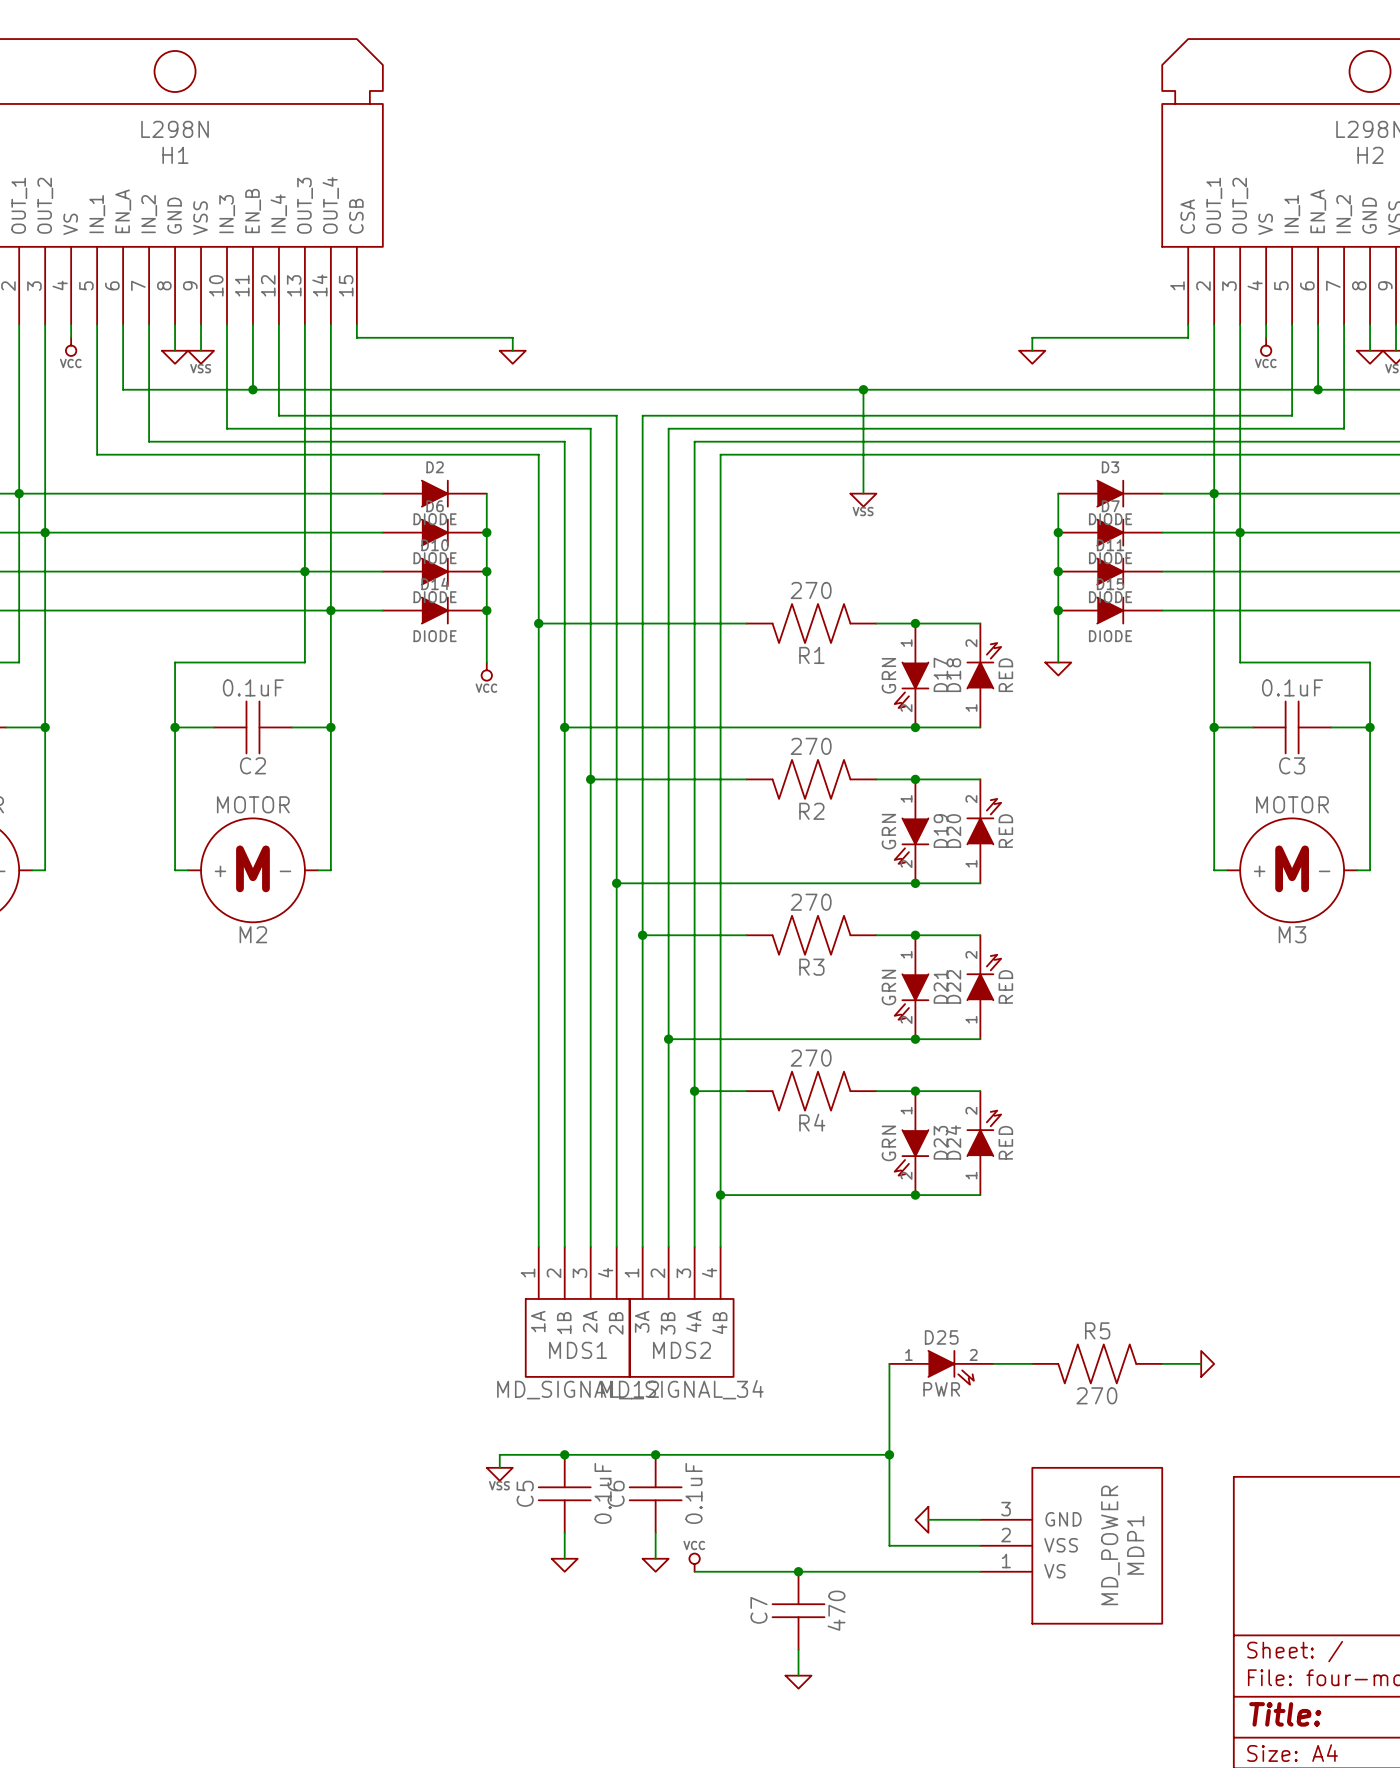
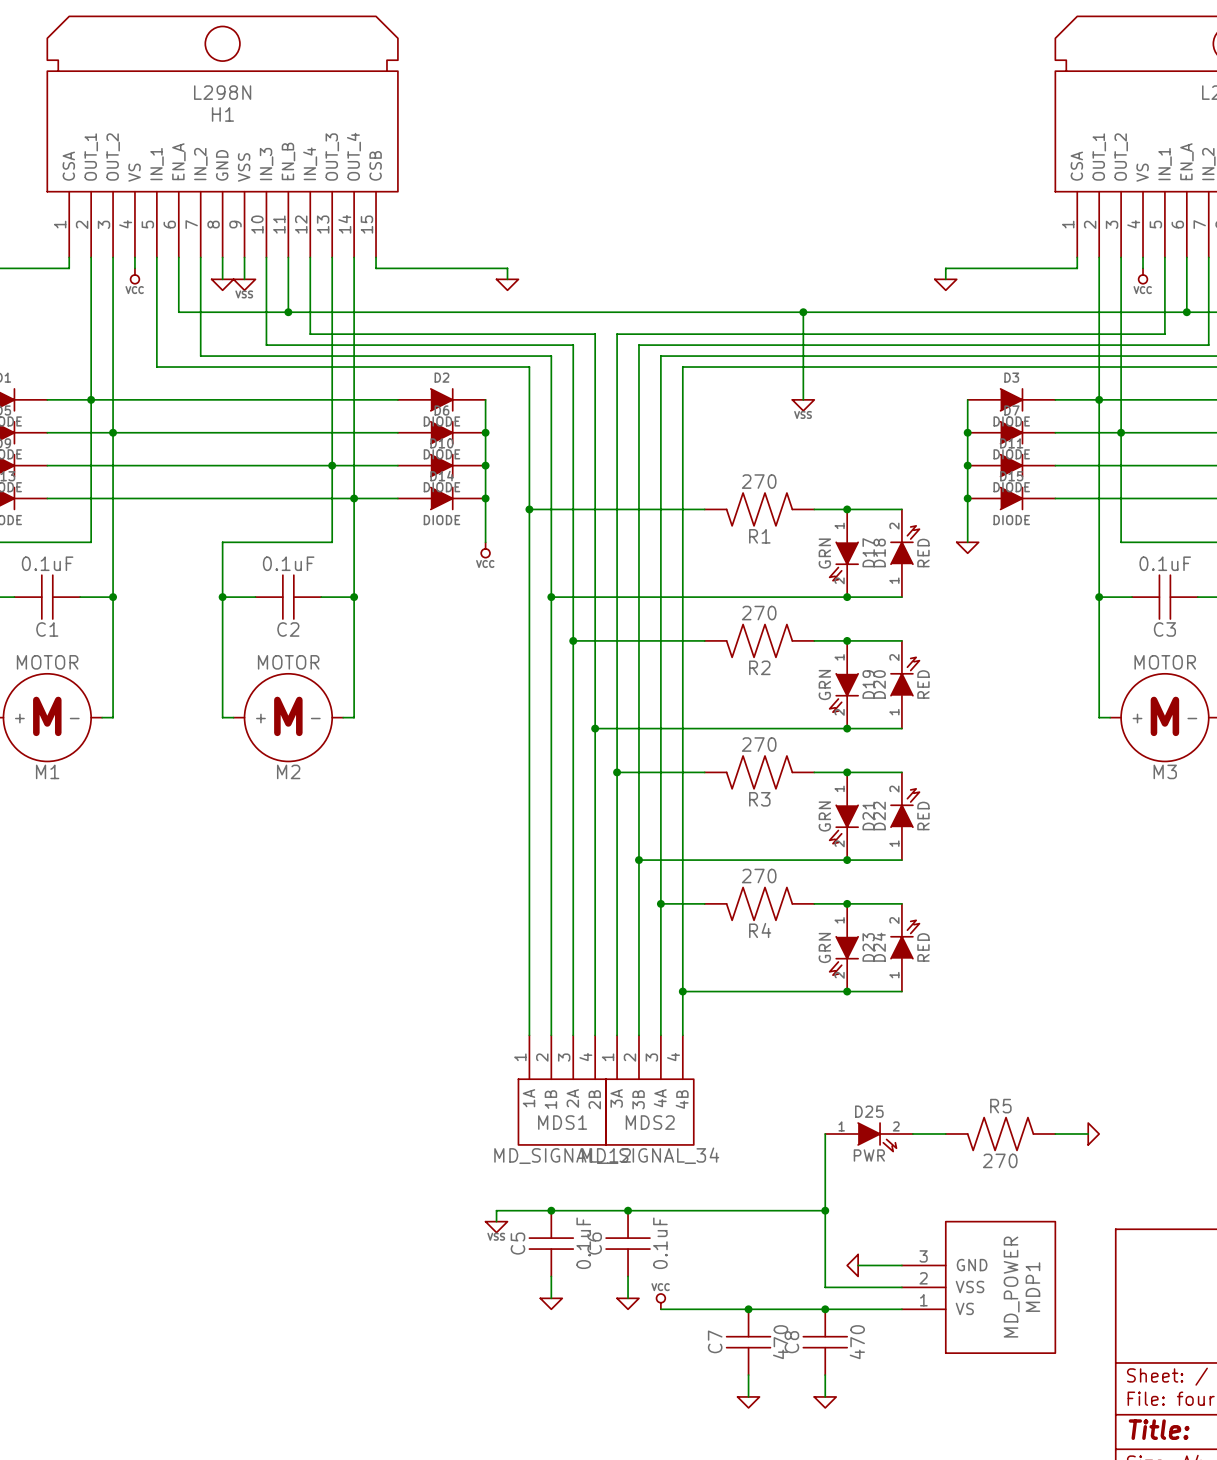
junction: none -> (825, 1309)
C8: none -> 470 (825, 1342)
wire: none -> (825, 1375) (825, 1396)
power symbol: none -> (825, 1402)

